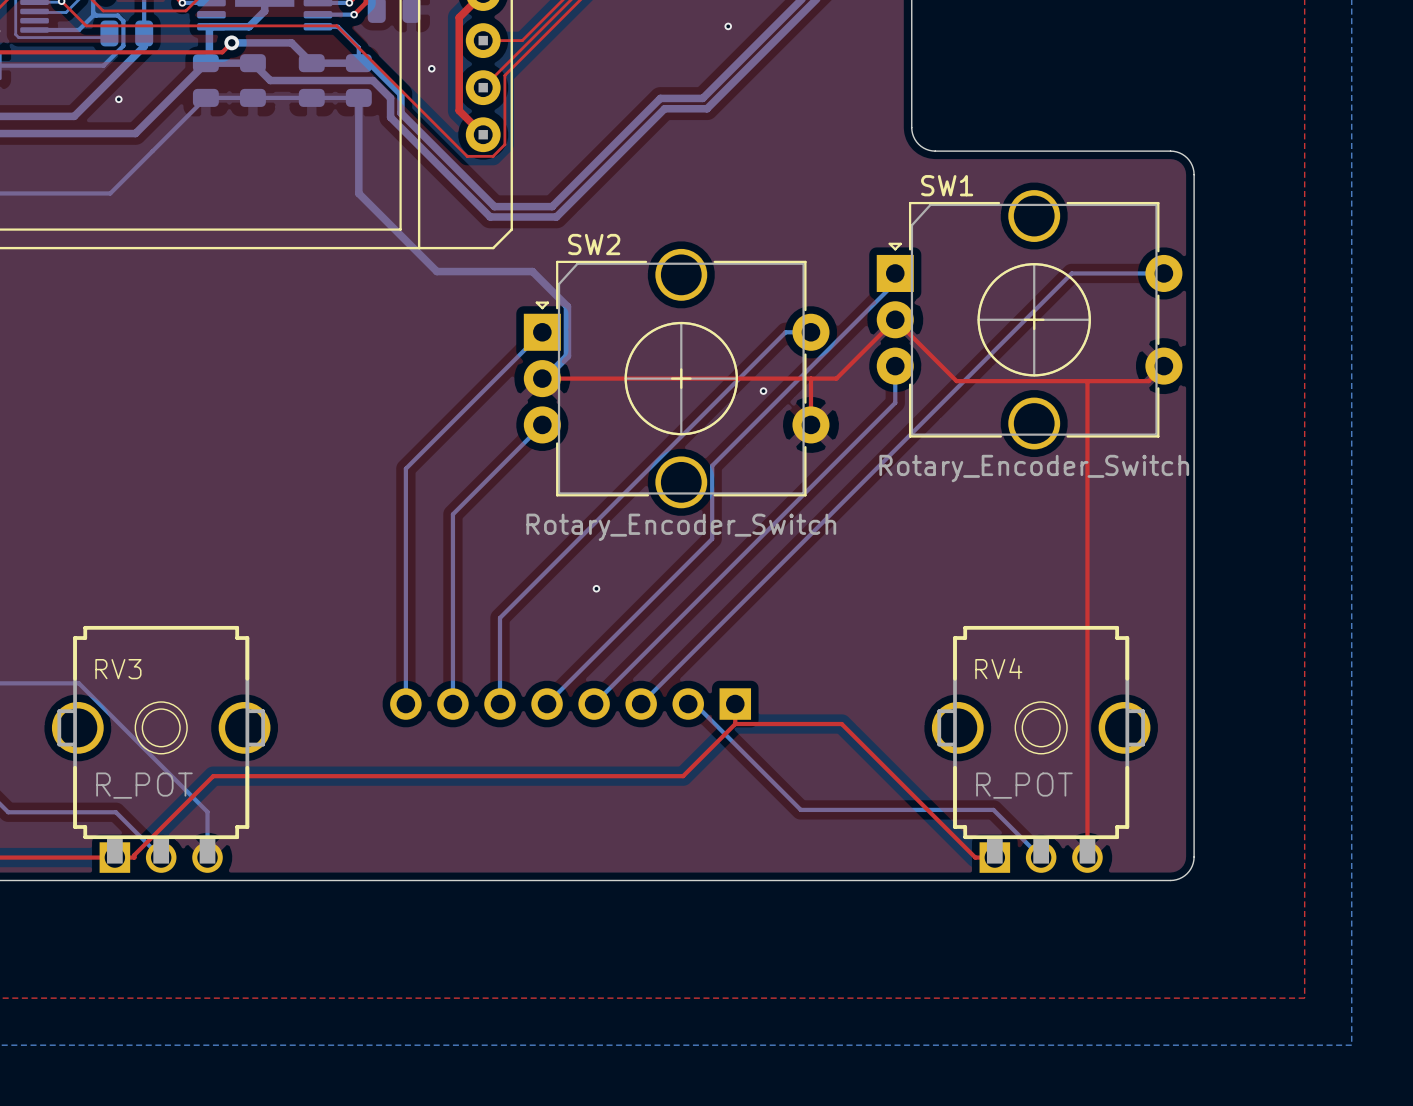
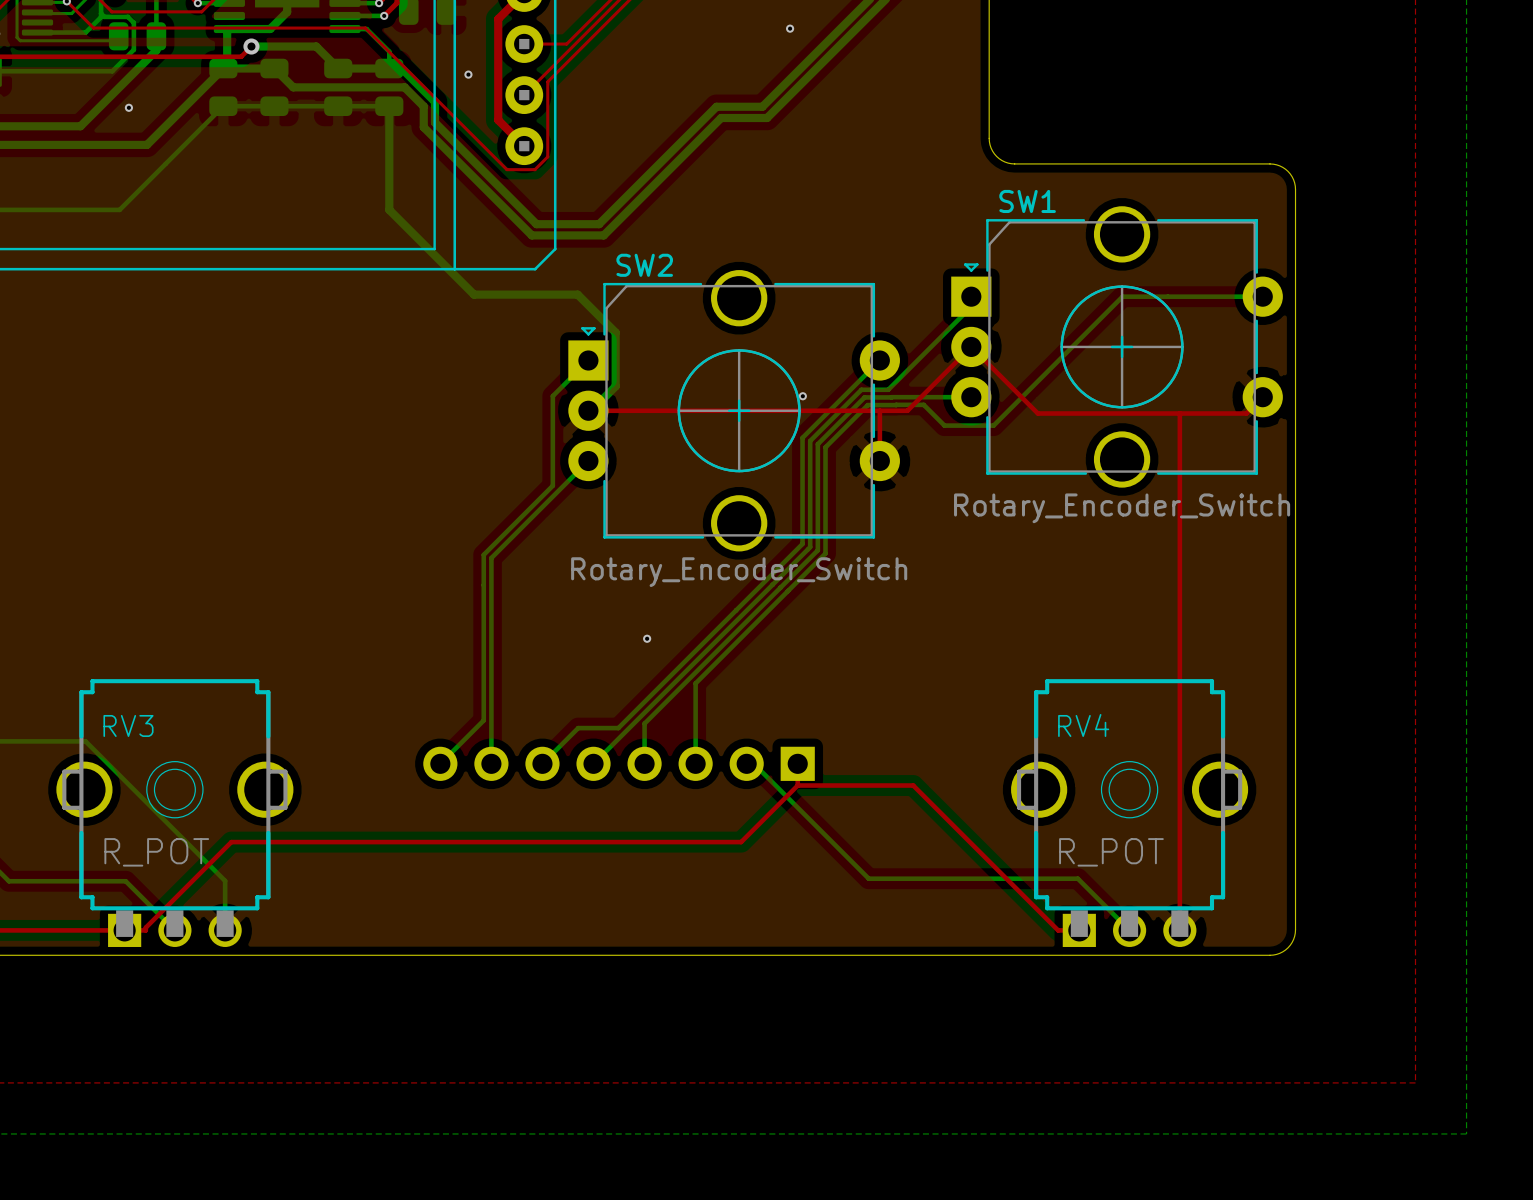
bottom track: (1071, 273) (641, 704) -> (825, 447) (825, 553) (695, 683) (695, 763)
bottom track: none -> (1162, 296) (1122, 296) (993, 425) (944, 425) (923, 404) (896, 404)
bottom track: (810, 332) (785, 332) (499, 617) (499, 704) -> (879, 360) (802, 437) (802, 543) (618, 728) (578, 728) (542, 763)
bottom track: (818, 359) (712, 465) (712, 538) -> (888, 389) (861, 389) (810, 441) (810, 547) (772, 584)
bottom track: (509, 365) (405, 468) (405, 704) -> (552, 396) (552, 485) (483, 554) (483, 720) (440, 763)
bottom track: none -> (891, 397) (971, 397)
bottom track: (895, 366) (895, 402) (594, 704) -> (891, 397) (864, 397) (817, 444) (817, 550) (644, 723) (644, 763)
bottom track: none -> (896, 405) (867, 405) (825, 447)
via position: (763, 391) -> (802, 396)

